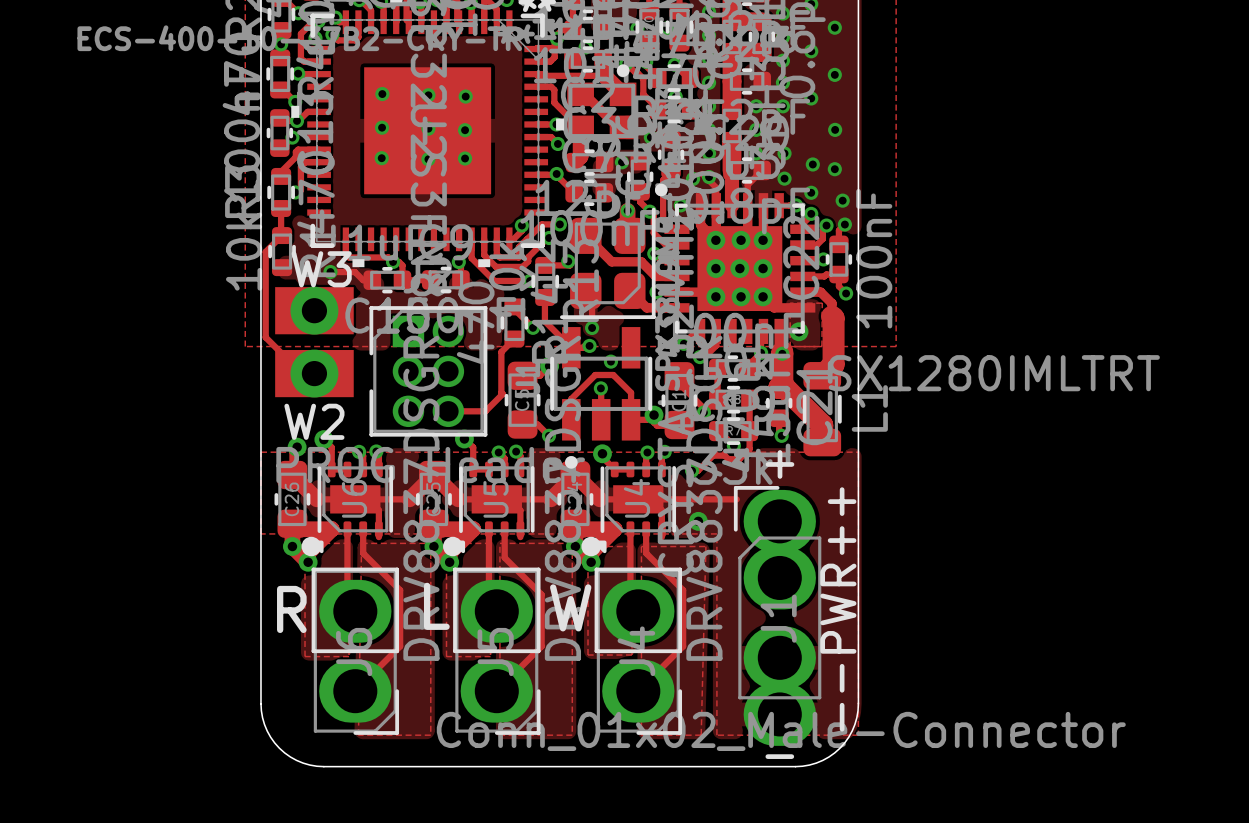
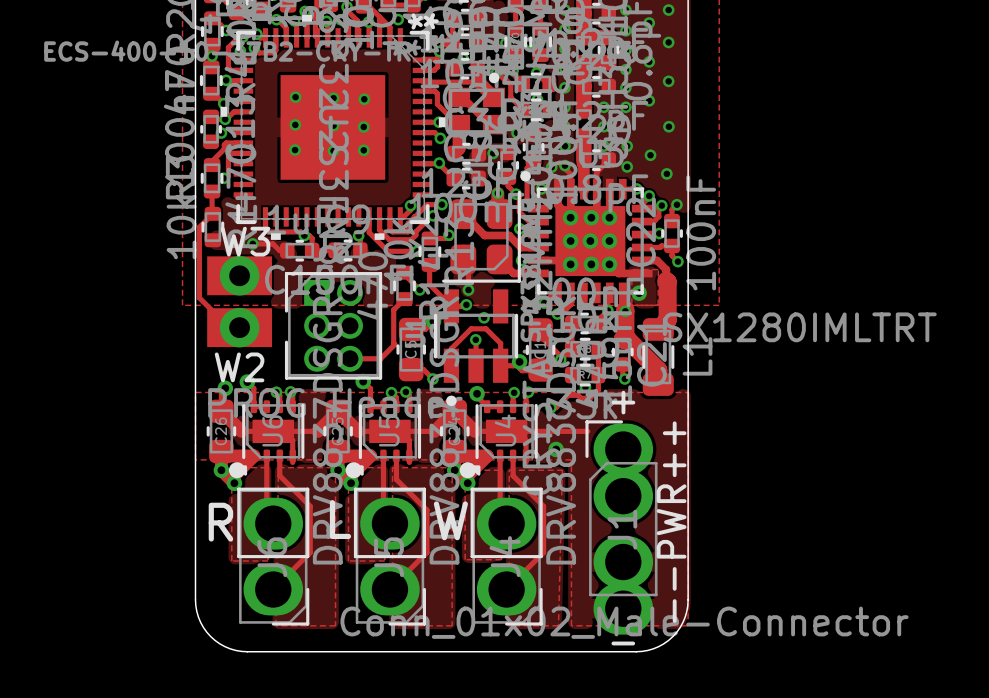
via: (834, 169) -> none
via: (811, 192) -> none
via position: (842, 200) -> (666, 173)

